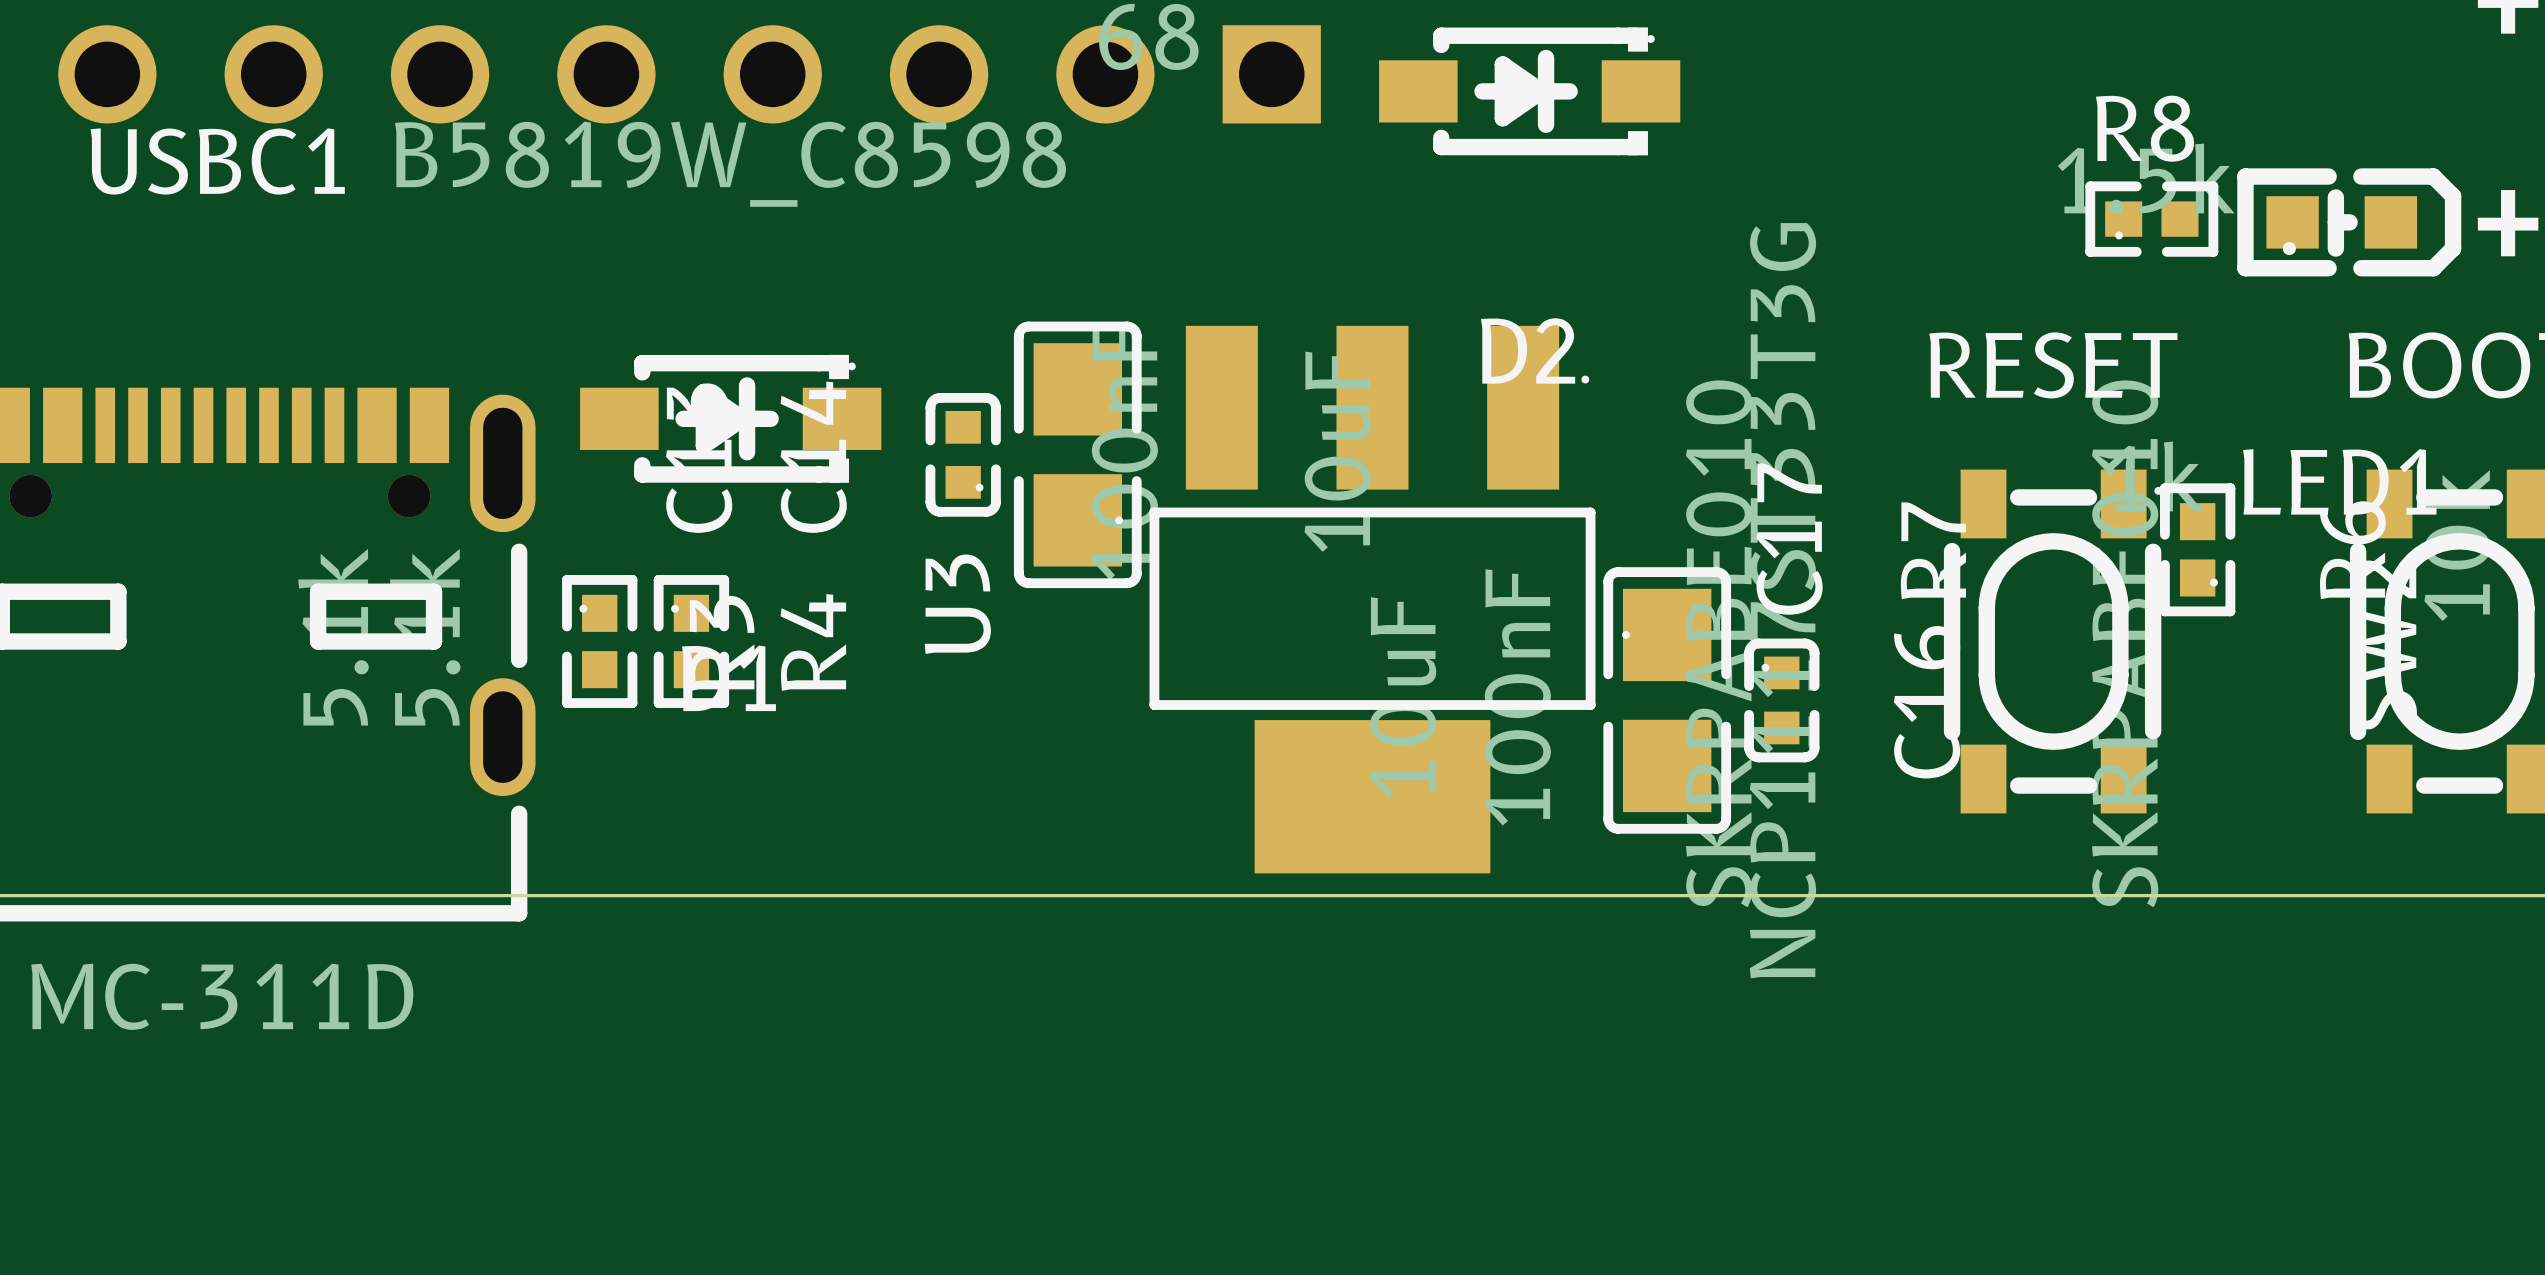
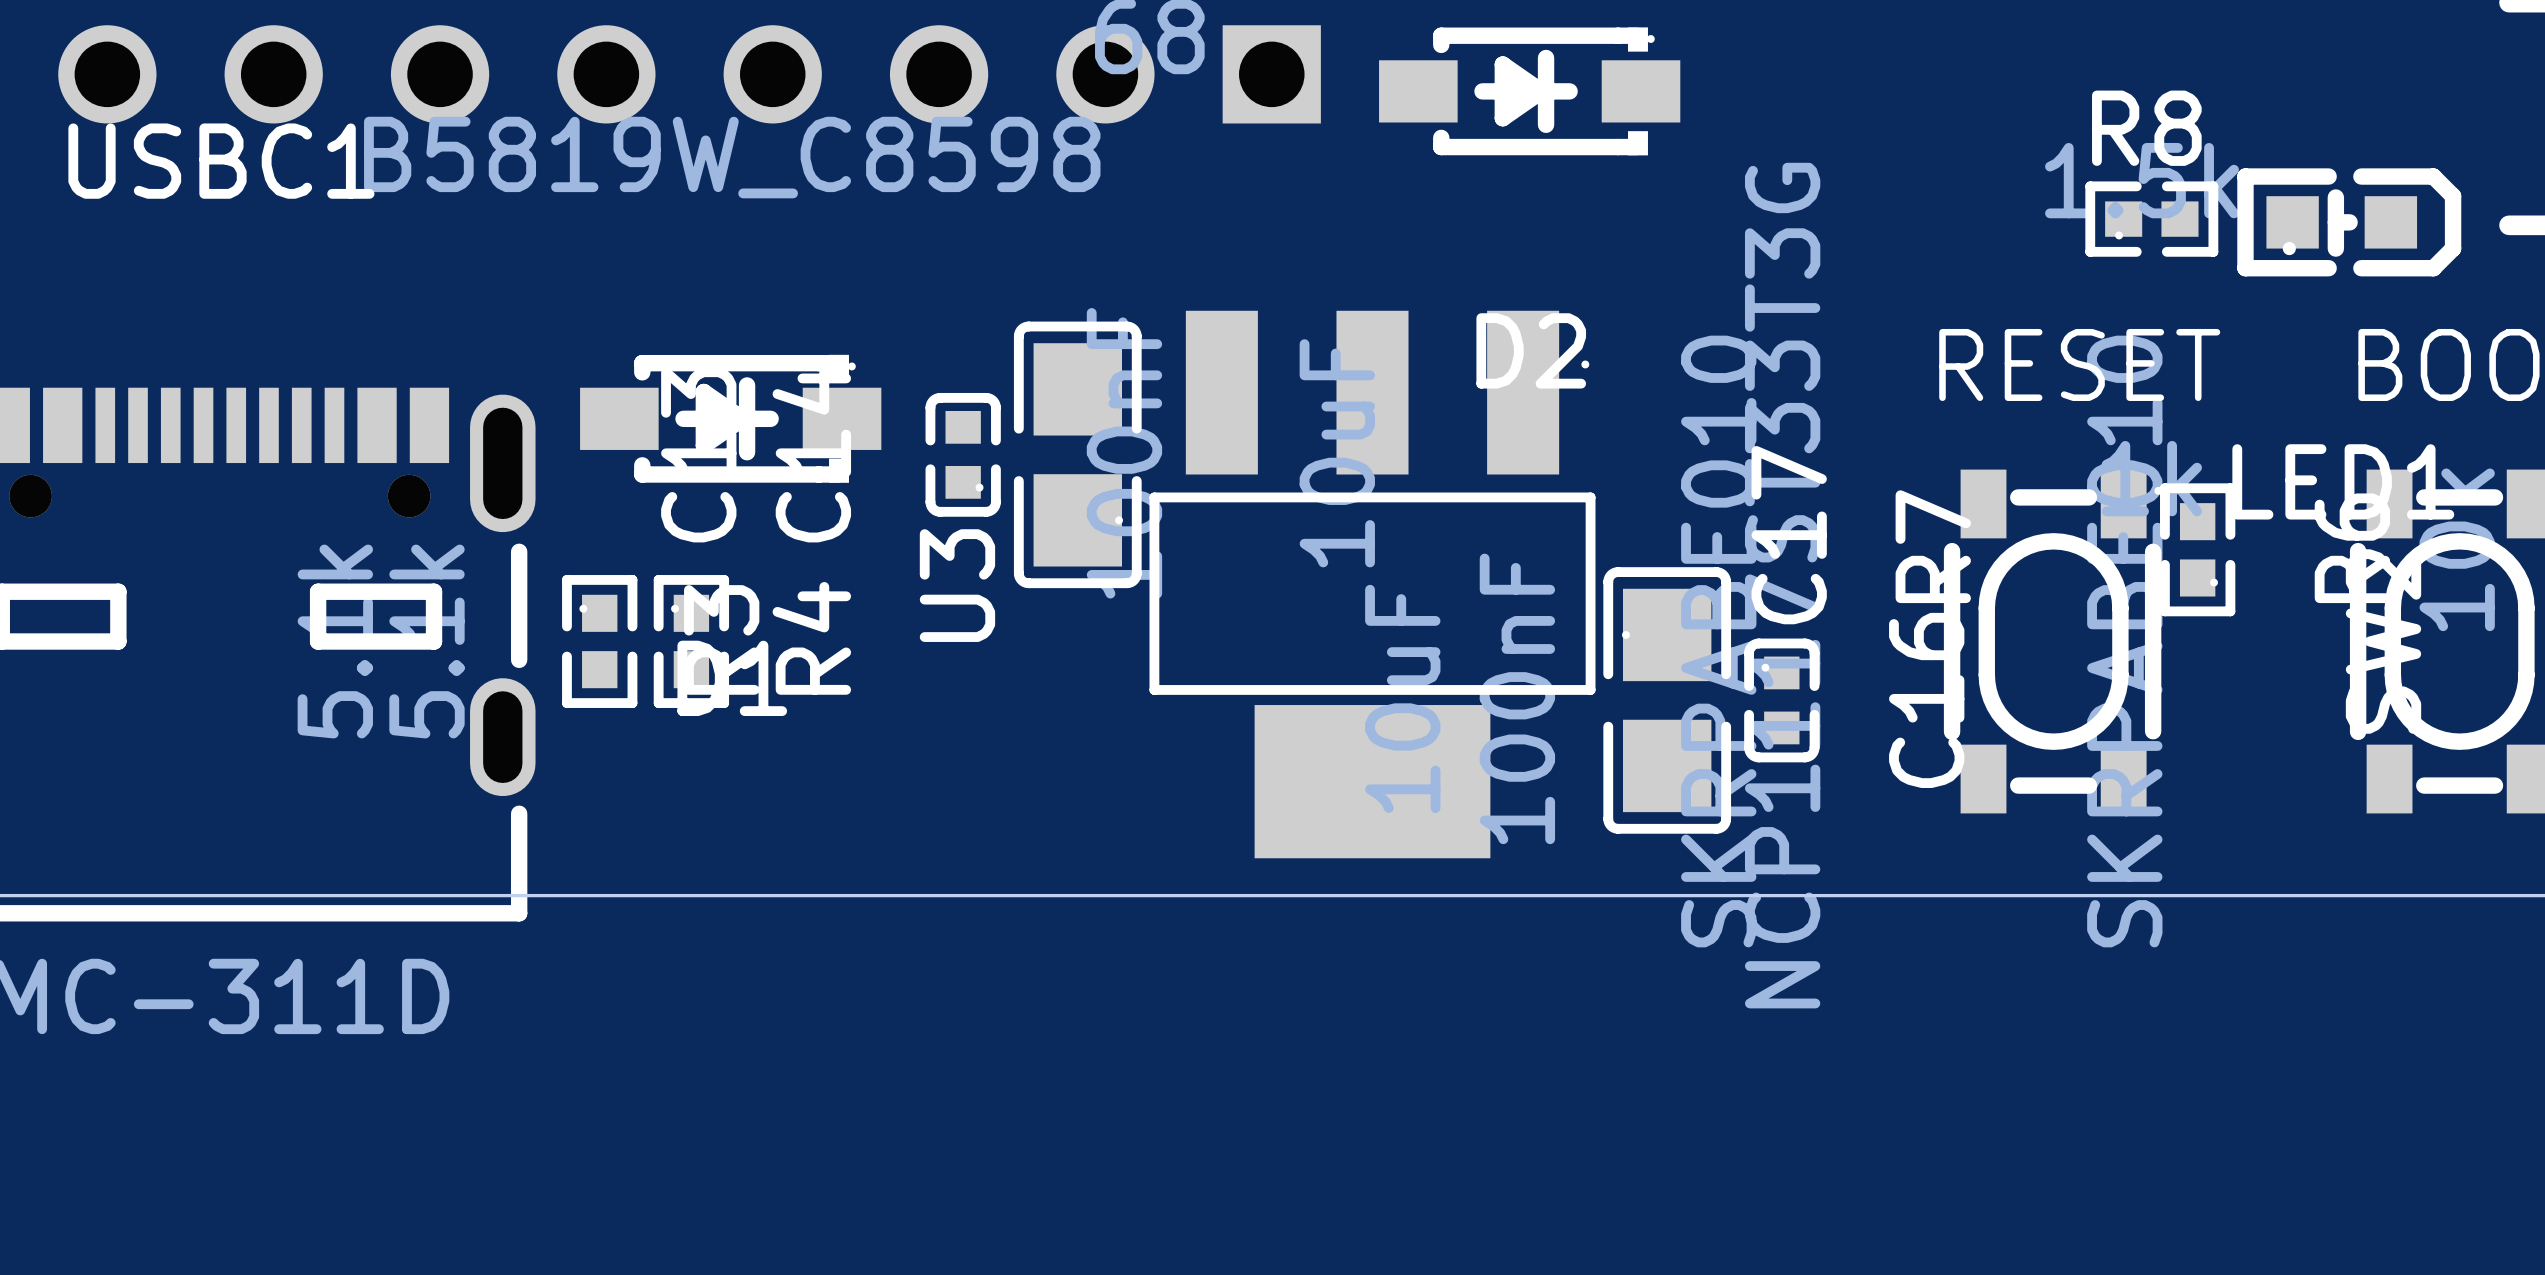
U3 position: (1372, 599) -> (1372, 584)

